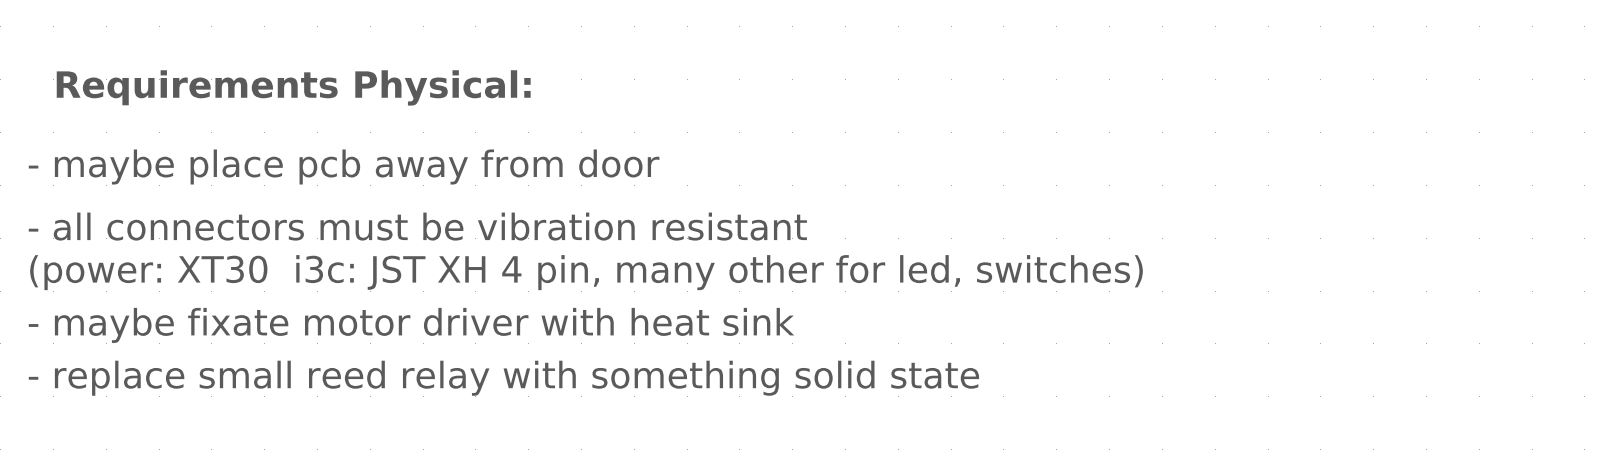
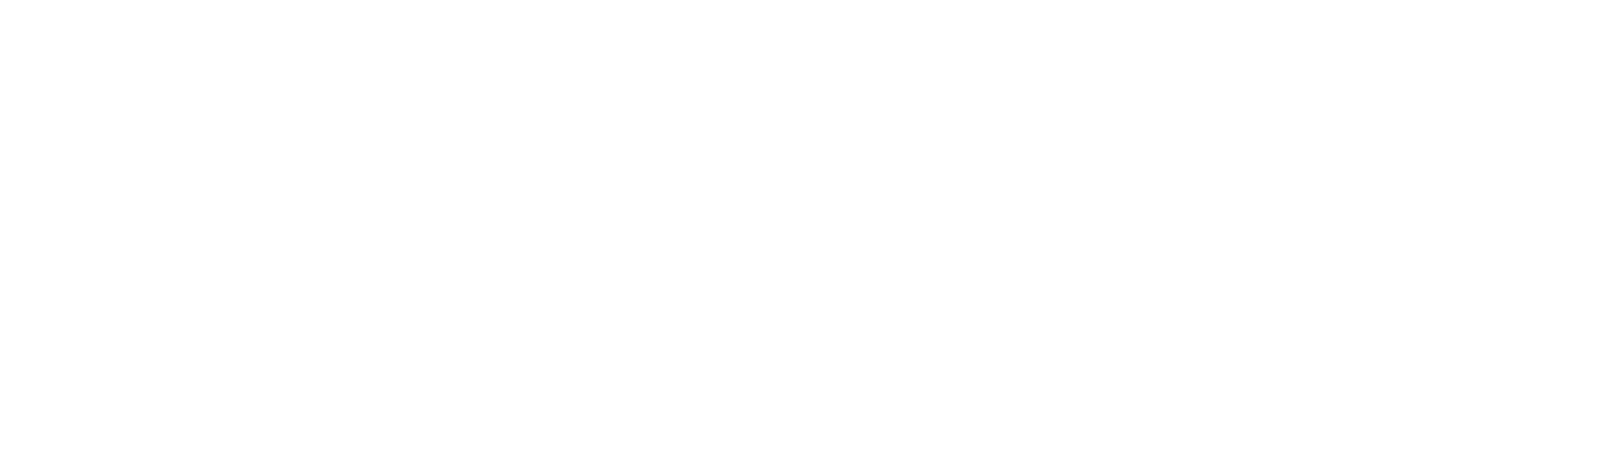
text: Requirements Physical: (293, 87) -> none
text: - maybe place pcb away from door (344, 166) -> none
text: - all connectors must be vibration resistant (417, 226) -> none
text: (power: XT30 i3c: JST XH 4 pin, many other for led, switches) (586, 272) -> none
text: - maybe fixate motor driver with heat sink (411, 325) -> none
text: - replace small reed relay with something solid state (503, 378) -> none

